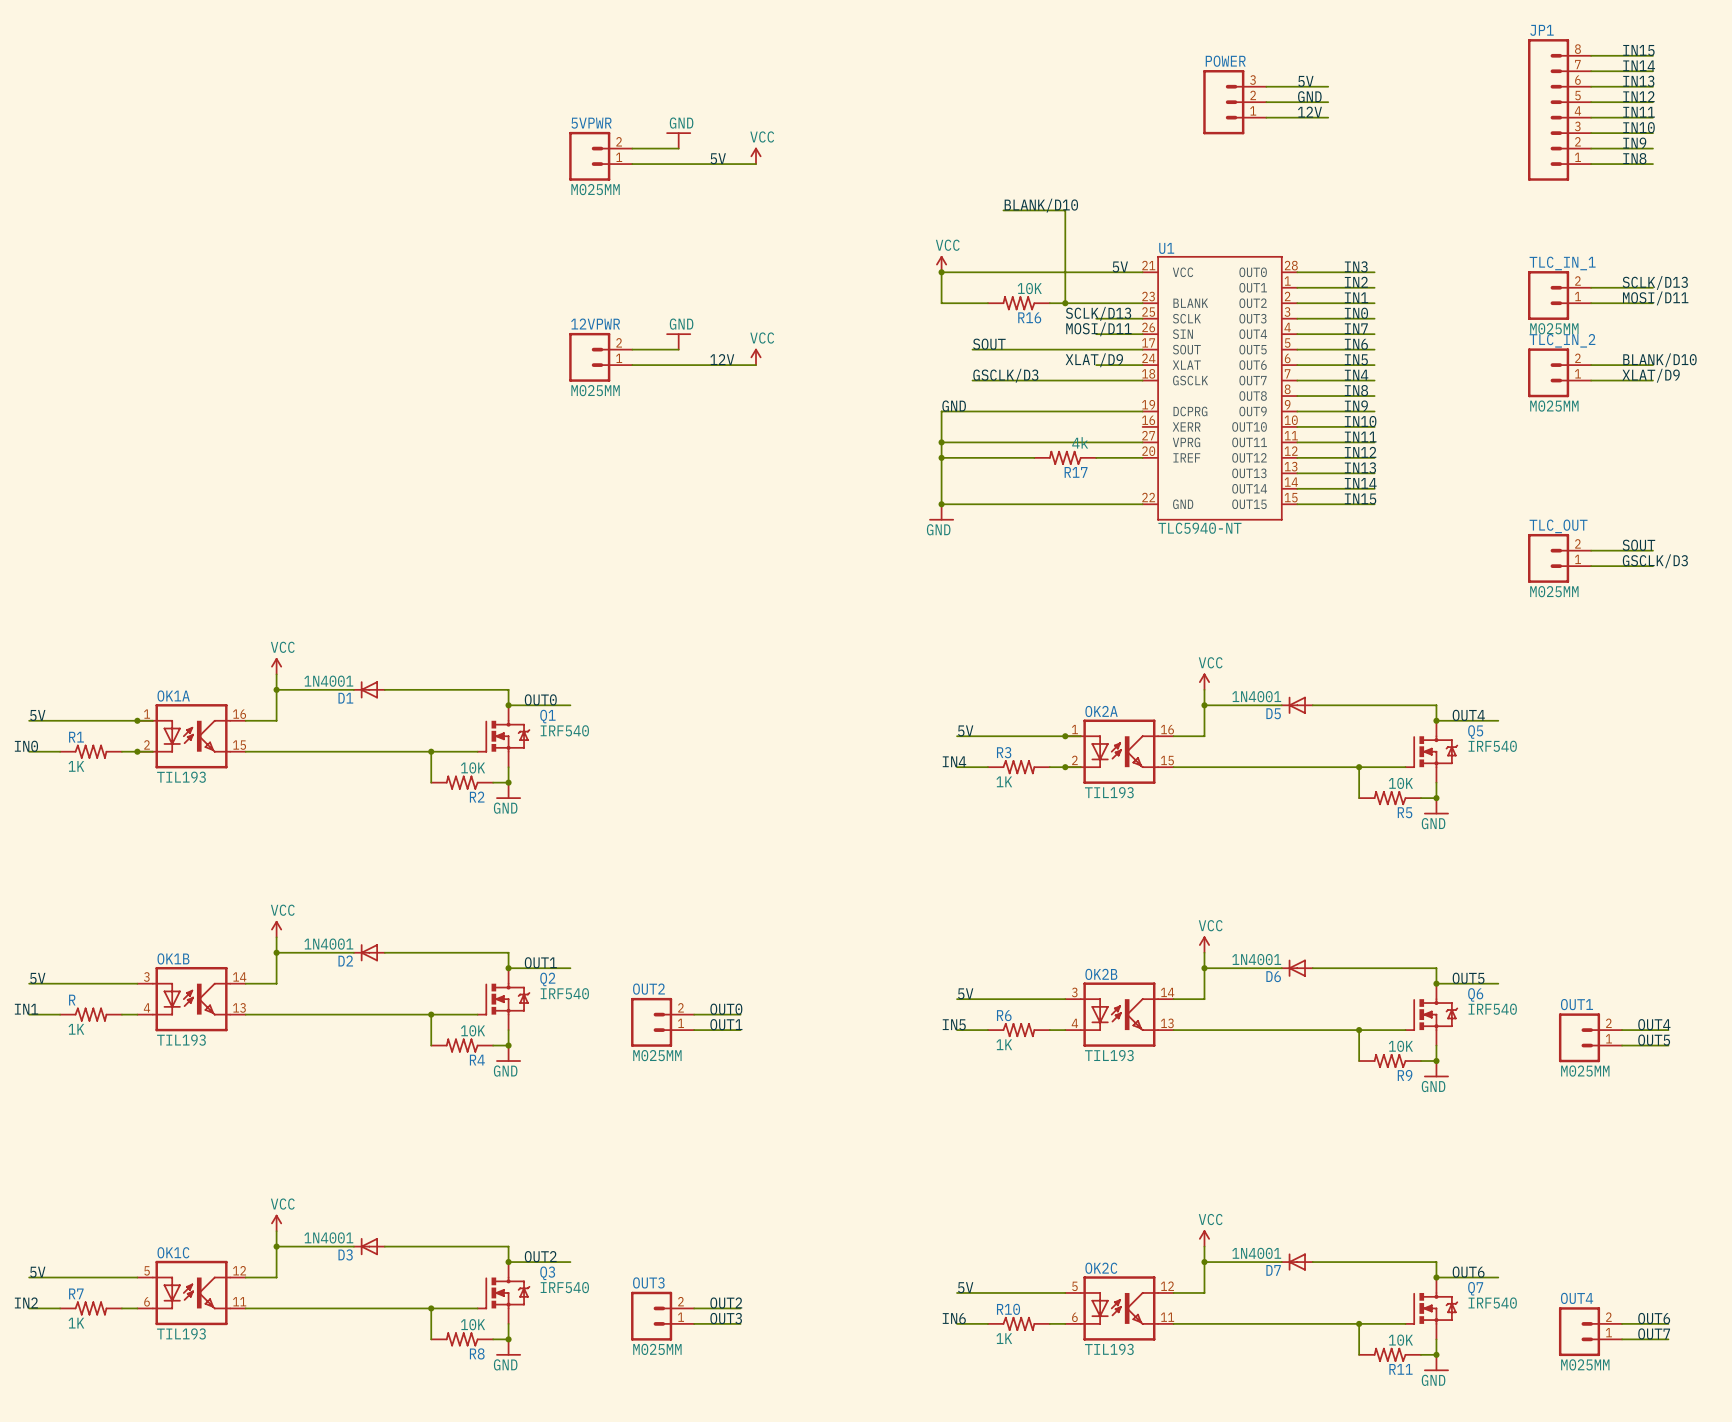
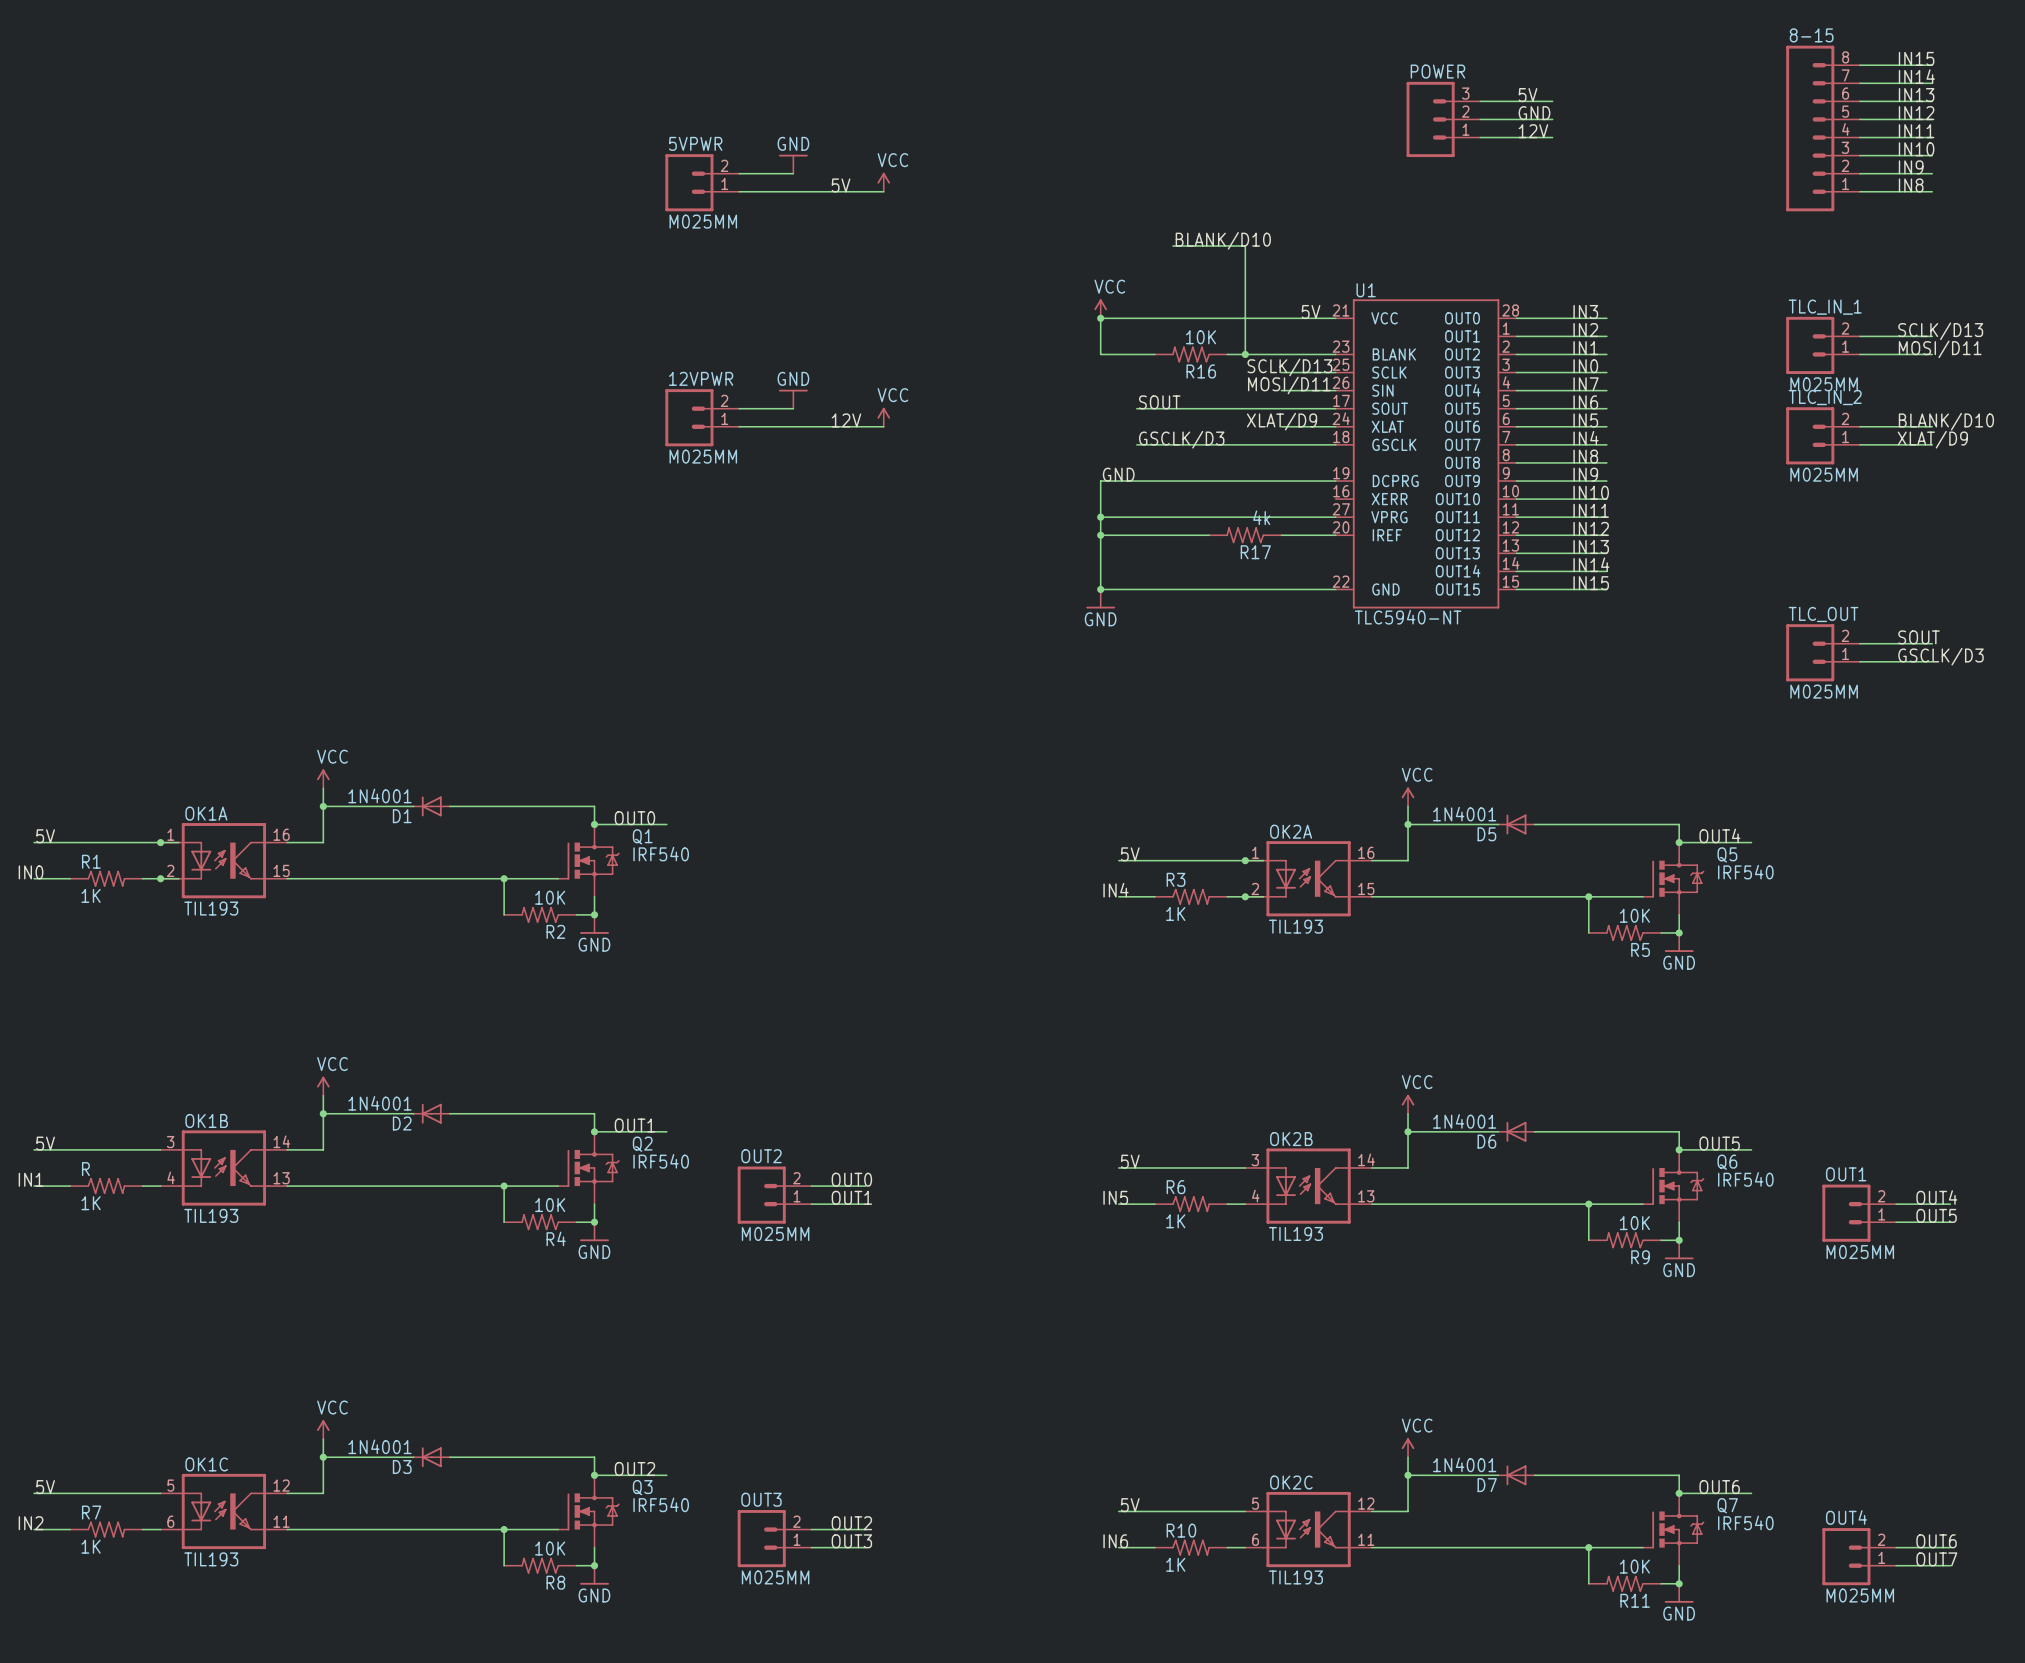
JP1 name: JP1 (1542, 30) -> 8-15 (1811, 35)

